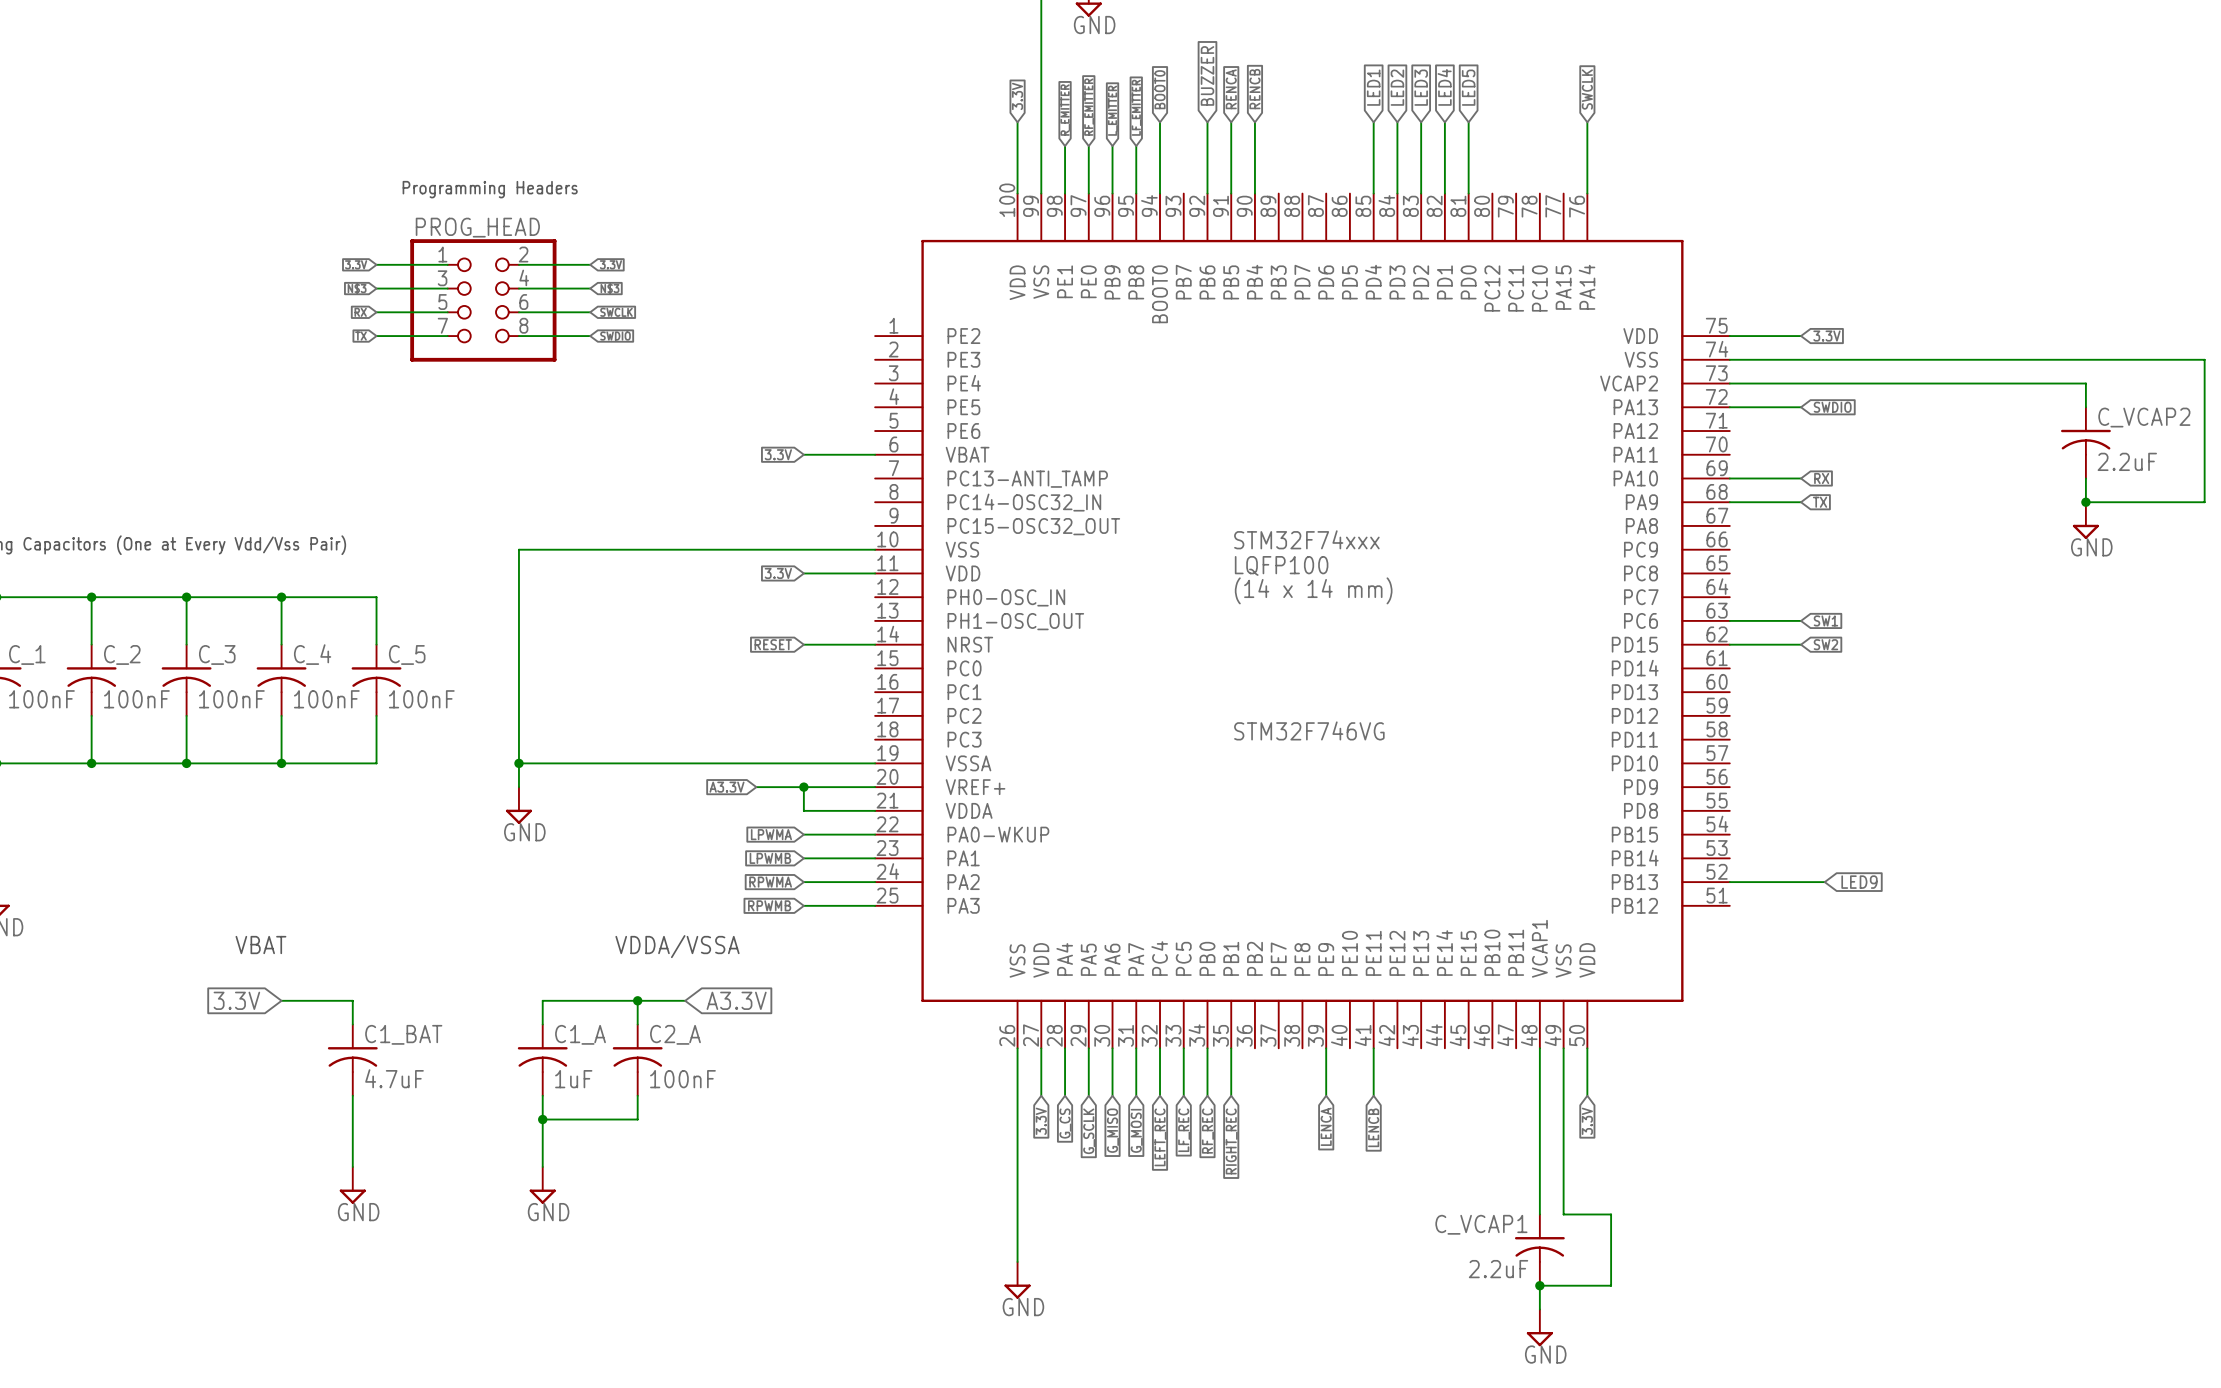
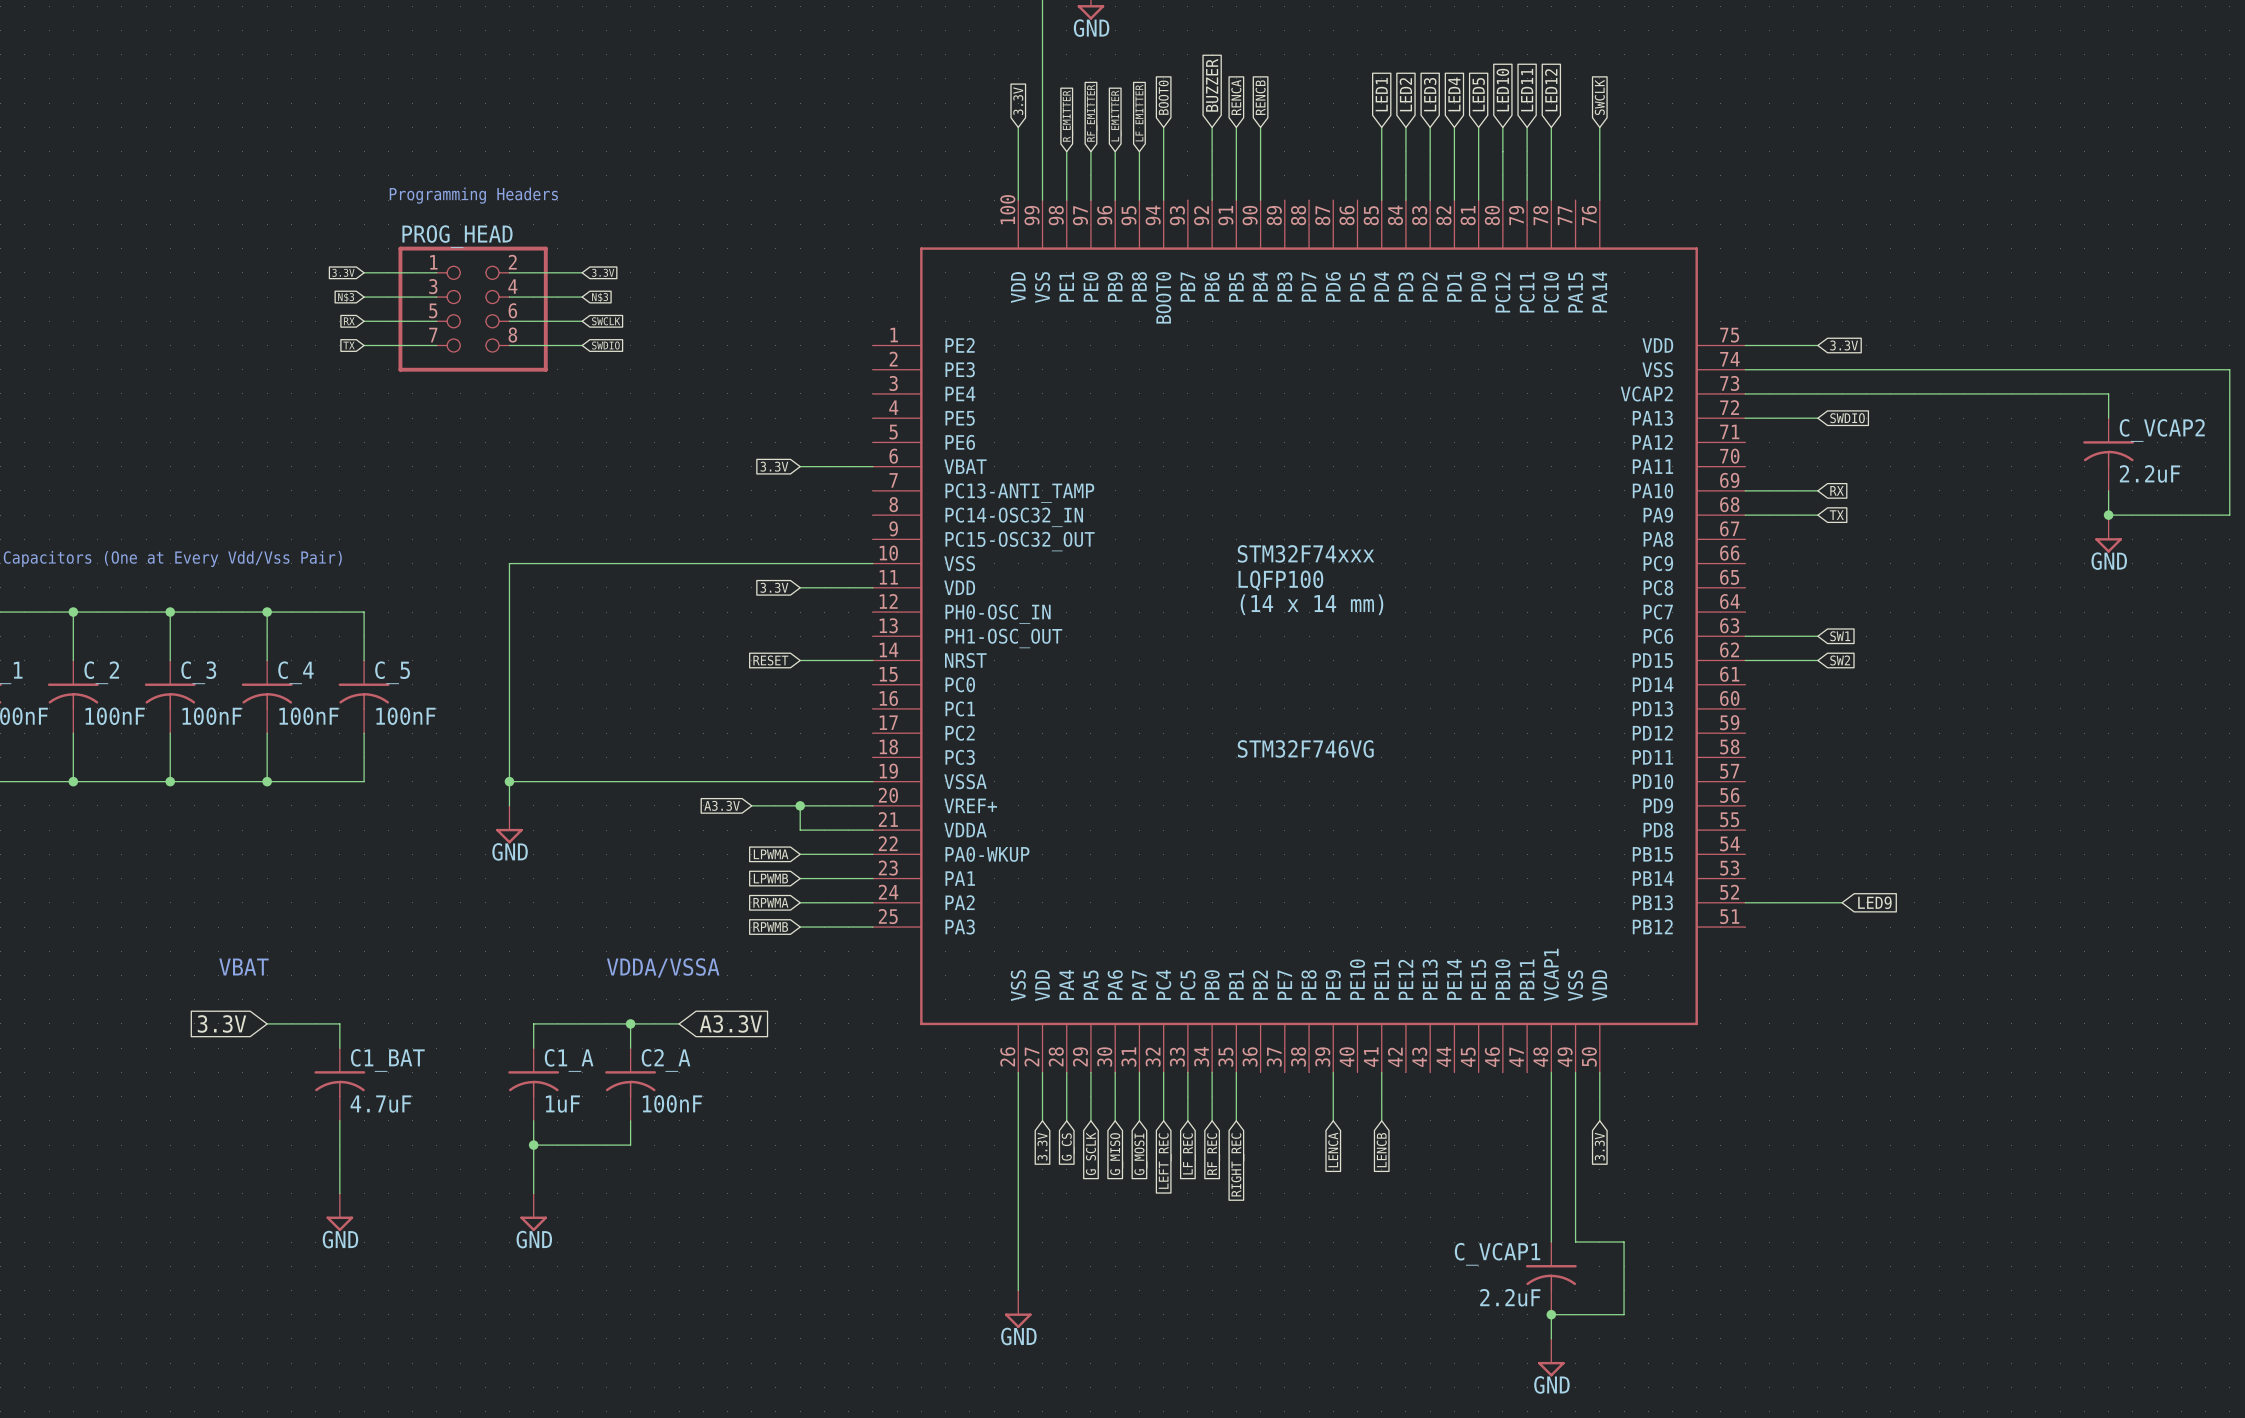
global label: none -> LED10 (1502, 90)
global label: none -> LED11 (1527, 90)
global label: none -> LED12 (1551, 90)
wire: none -> (1502, 127) (1502, 200)
wire: none -> (1527, 127) (1527, 200)
wire: none -> (1551, 127) (1551, 200)

